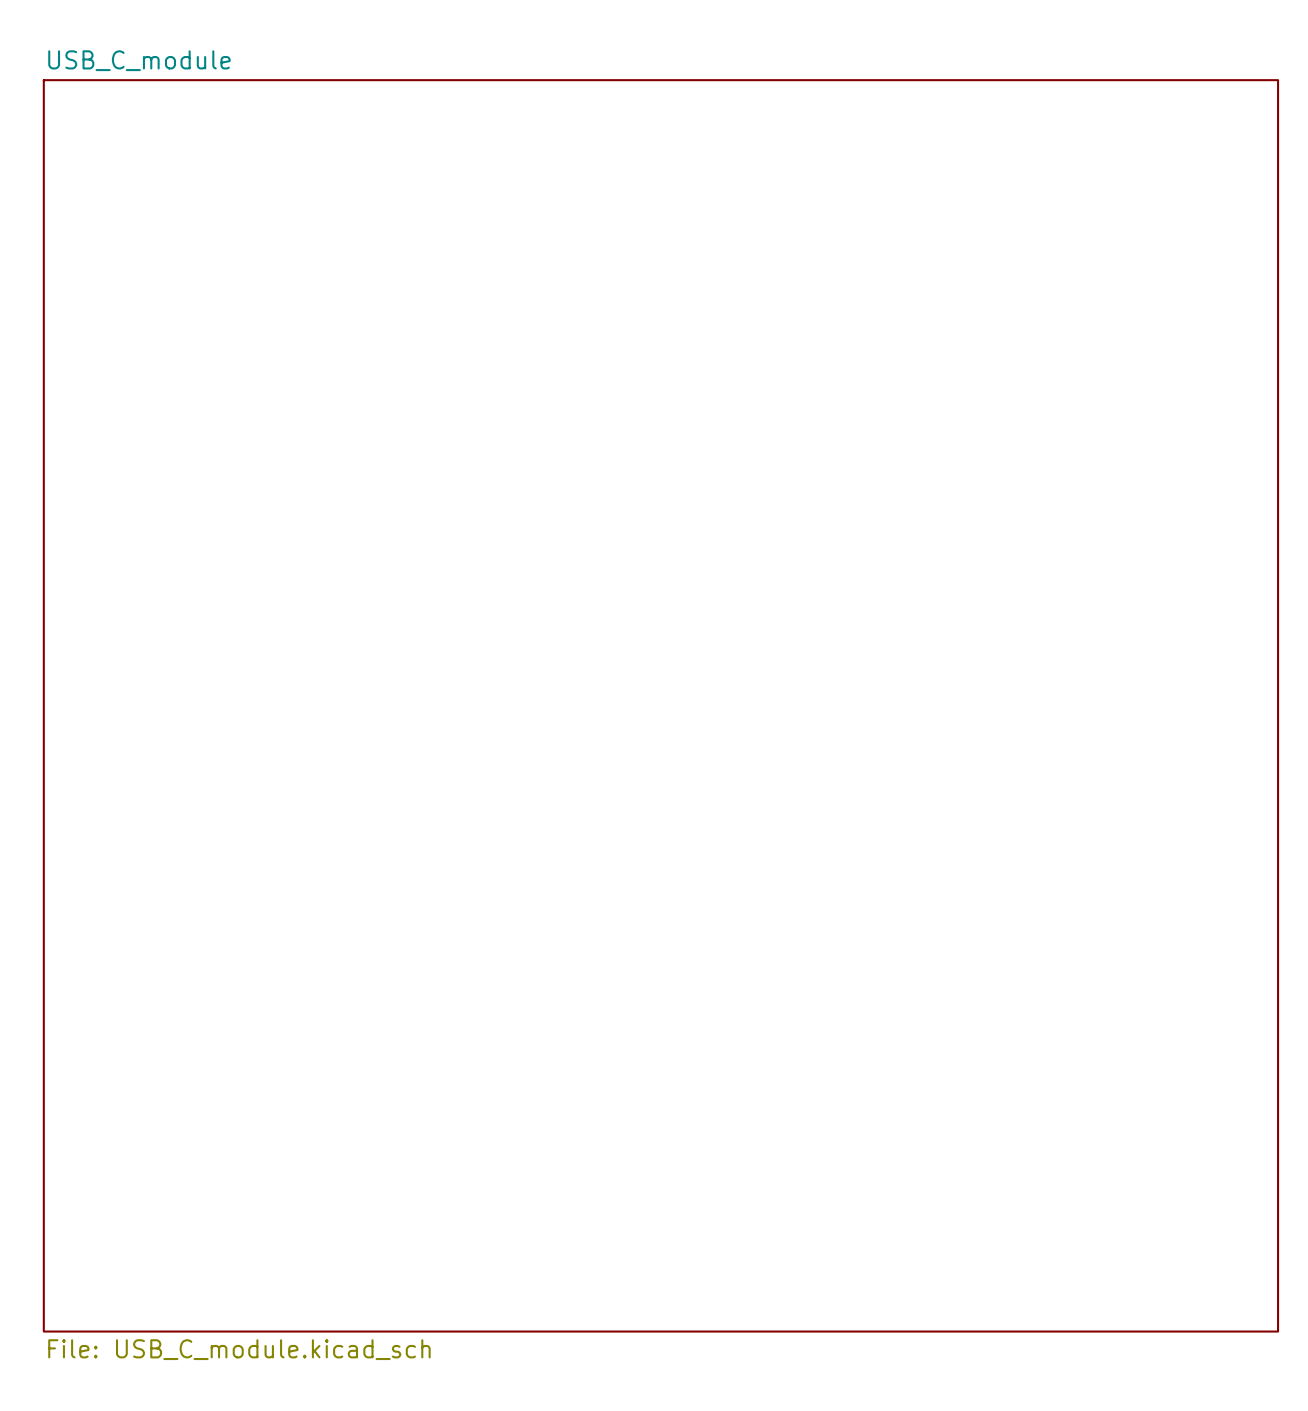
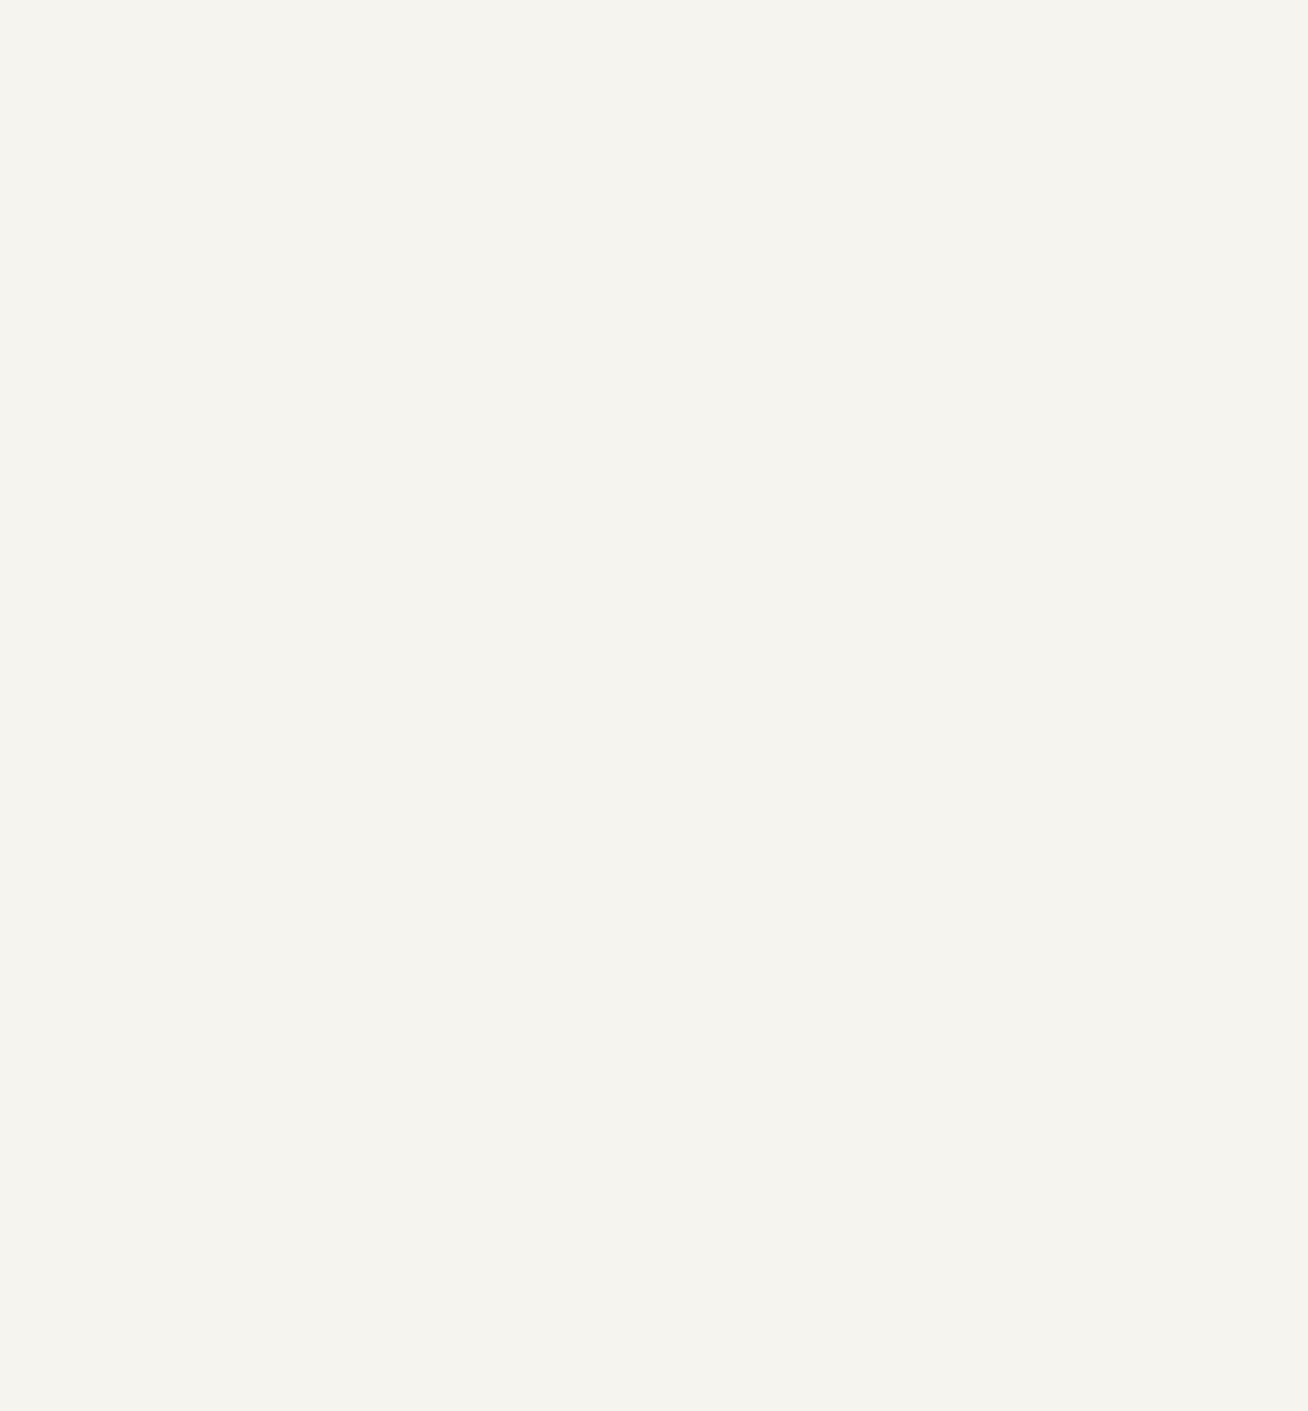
sheet USB_C_module: File: USB_C_module.kicad_sch (660, 705) -> none

